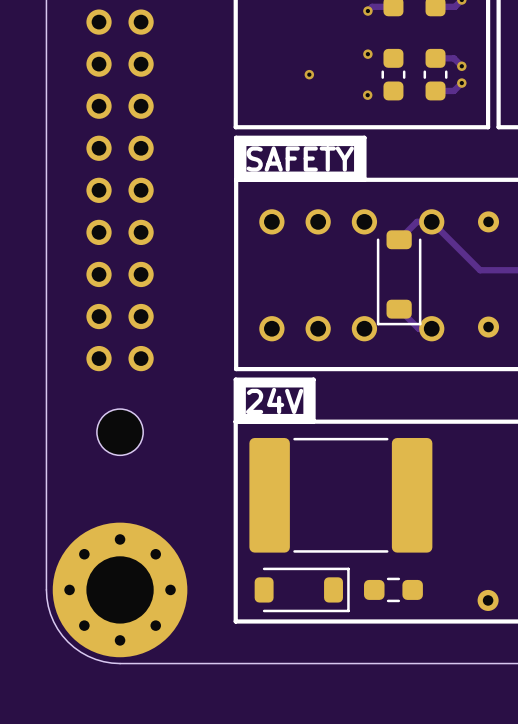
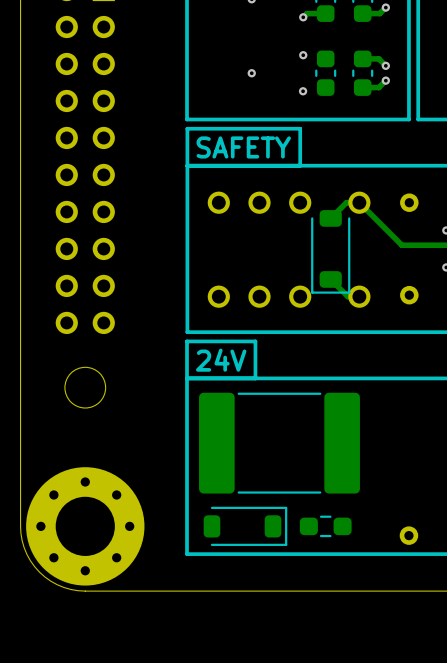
drawing: [236, 137, 365, 180] -> none
drawing: [235, 379, 314, 422] -> none

